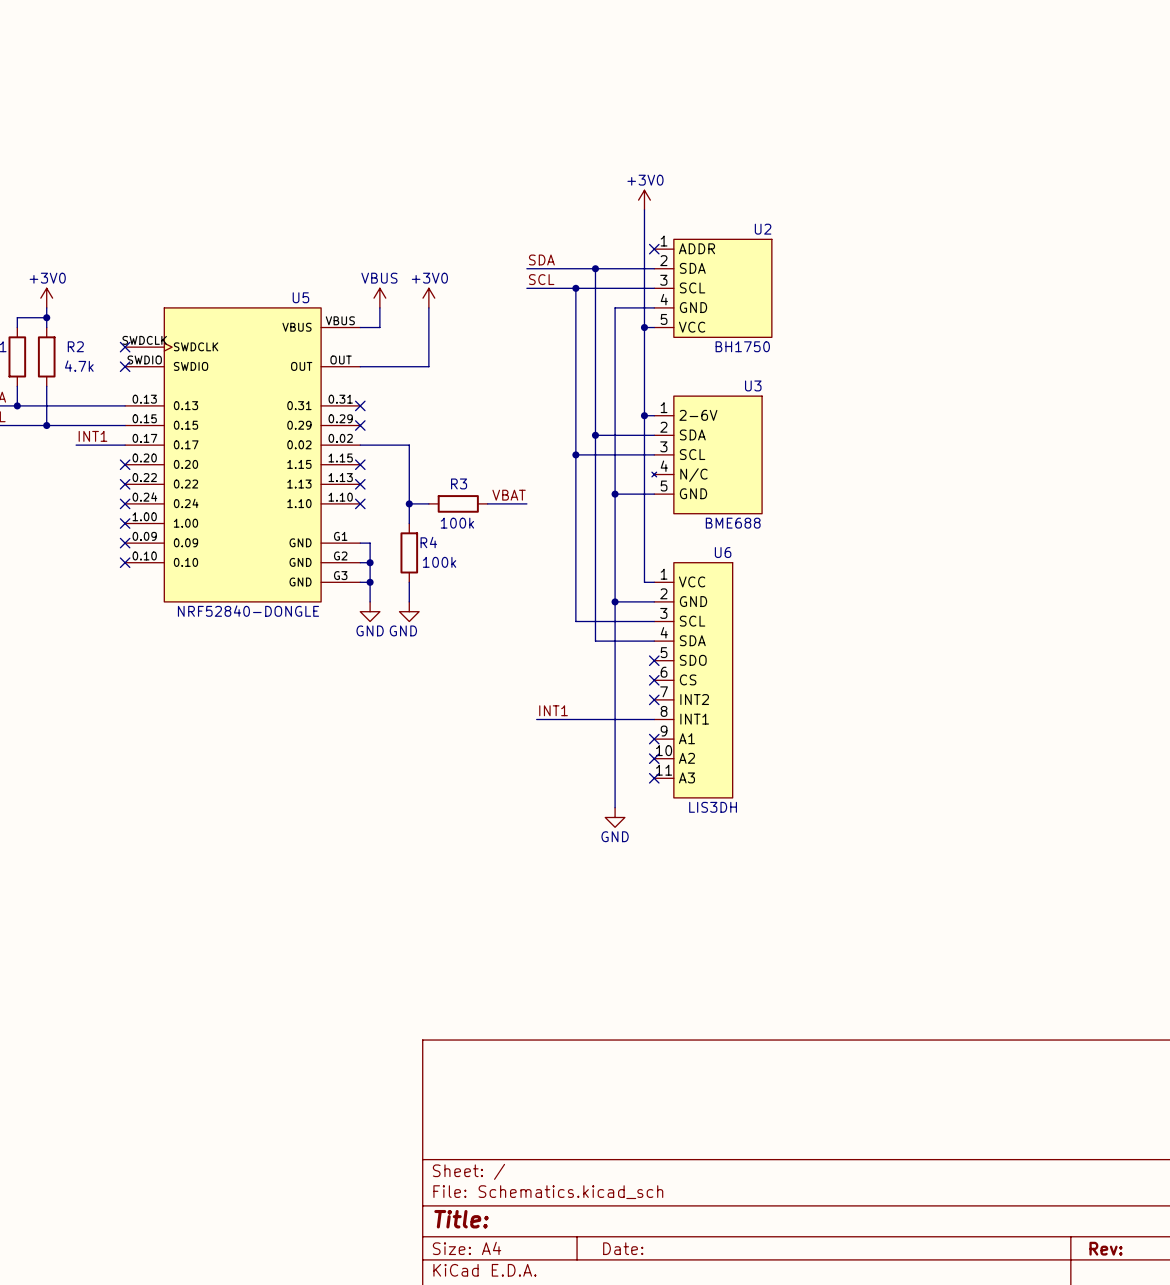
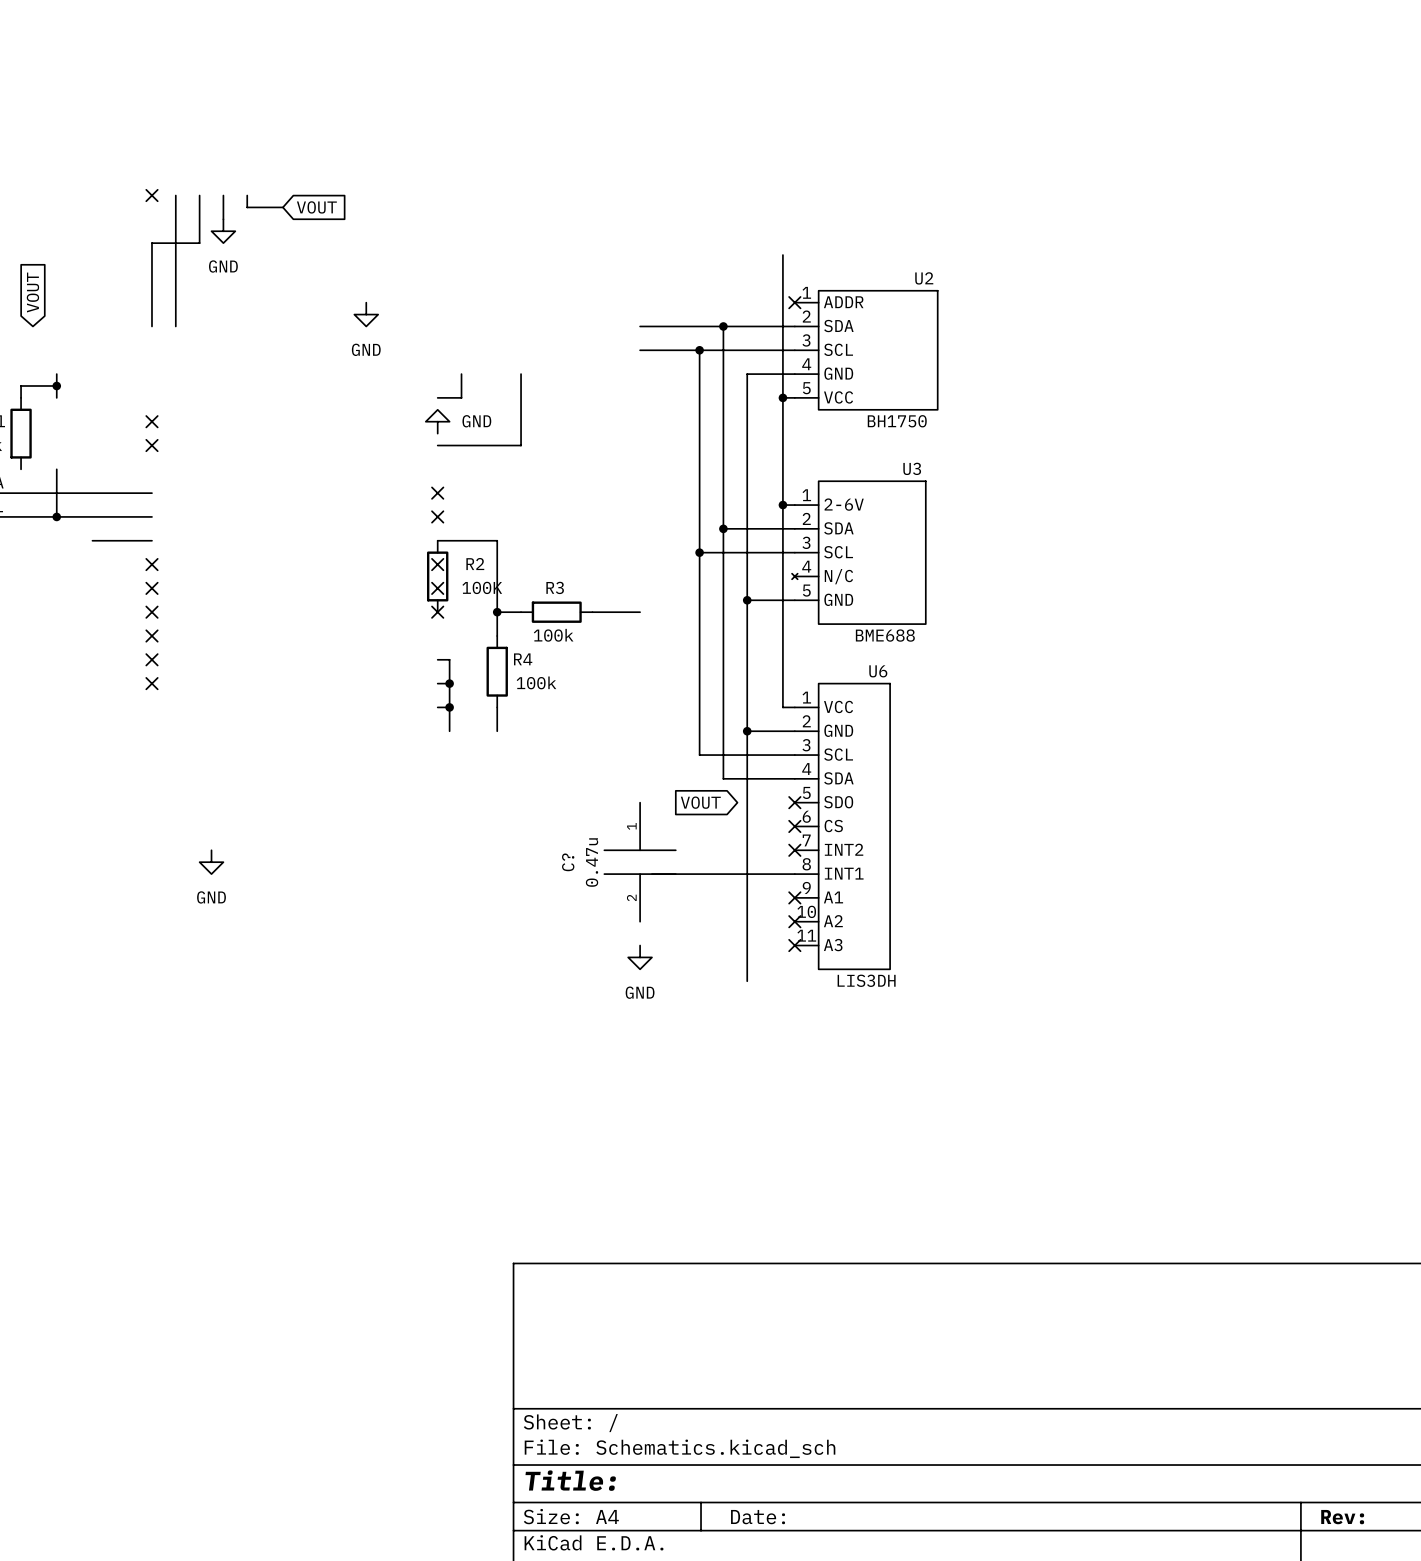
no-connect mark: none -> (151, 195)
wire: none -> (175, 195) (175, 326)
wire: none -> (199, 195) (199, 243) (151, 243) (151, 326)
wire: none -> (223, 195) (223, 219)
wire: none -> (247, 195) (247, 207) (282, 207)
global label: none -> VOUT (316, 207)
power symbol: none -> GND (223, 231)
power symbol: +3V0 (644, 200) -> none
global label: none -> VOUT (32, 292)
power symbol: none -> GND (366, 314)
label: SDA (541, 259) -> none
label: SCL (541, 279) -> none
power symbol: +3V0 (46, 298) -> none
power symbol: VBUS (379, 298) -> none
power symbol: +3V0 (428, 298) -> none
power symbol: none -> GND (437, 421)
R2 position: (46, 356) -> (437, 576)
R2 value: 4.7k (79, 366) -> 100K (482, 587)
wire: (17, 386) (17, 405) -> none
junction: (17, 405) -> none
label: INT1 (92, 436) -> none
U5: NRF52840-DONGLE (242, 454) -> none
label: VBAT (509, 495) -> none
power symbol: GND (370, 611) -> none
power symbol: GND (409, 611) -> none
global label: none -> VOUT (700, 802)
power symbol: none -> GND (211, 862)
C?: none -> 0.47u (640, 862)
label: INT1 (553, 710) -> none
power symbol position: GND (615, 817) -> GND (640, 957)
power symbol text position: GND (615, 836) -> GND (640, 992)

